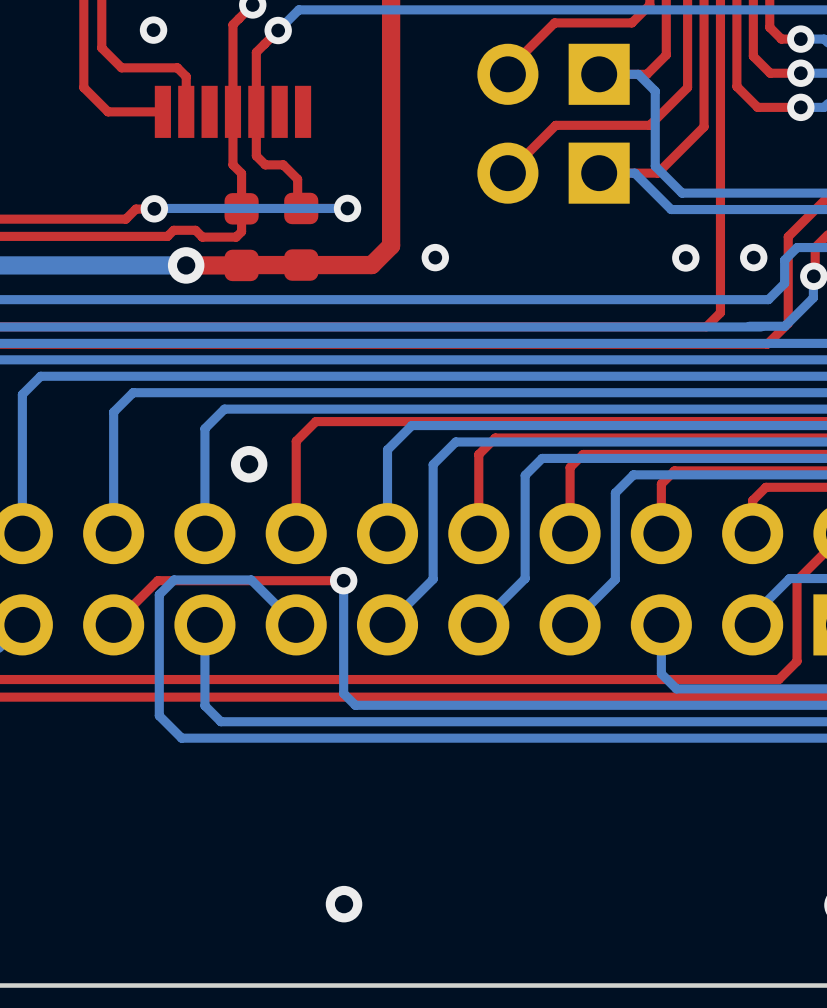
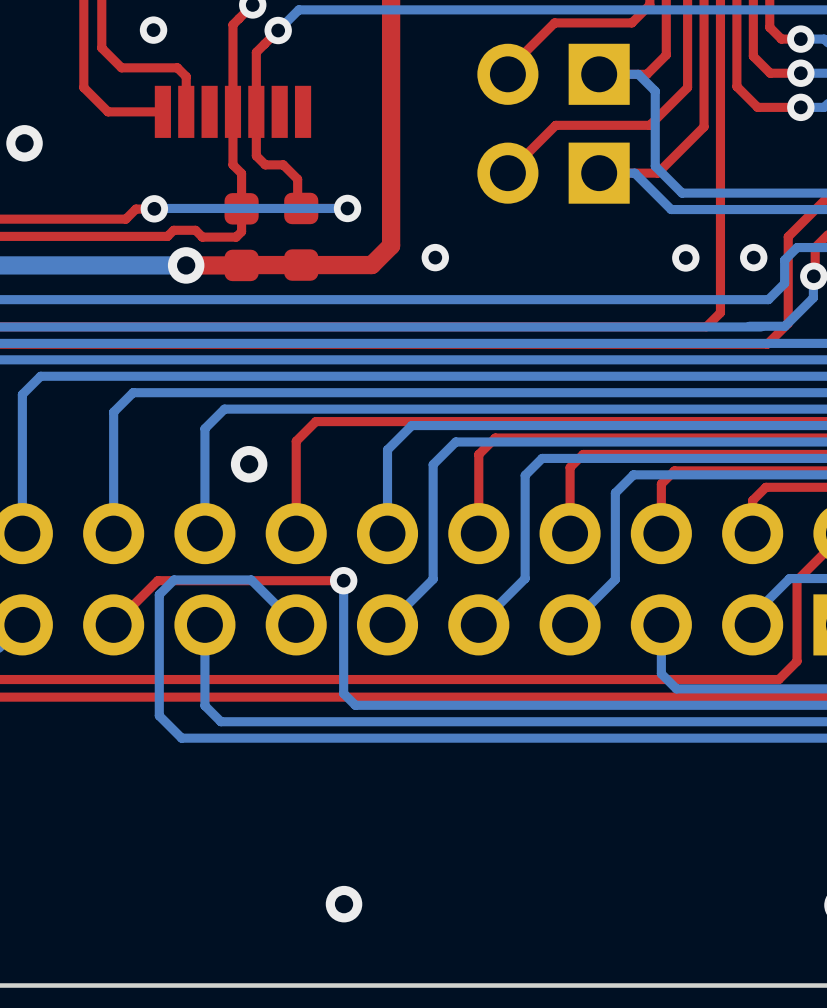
via: none -> (24, 143)

